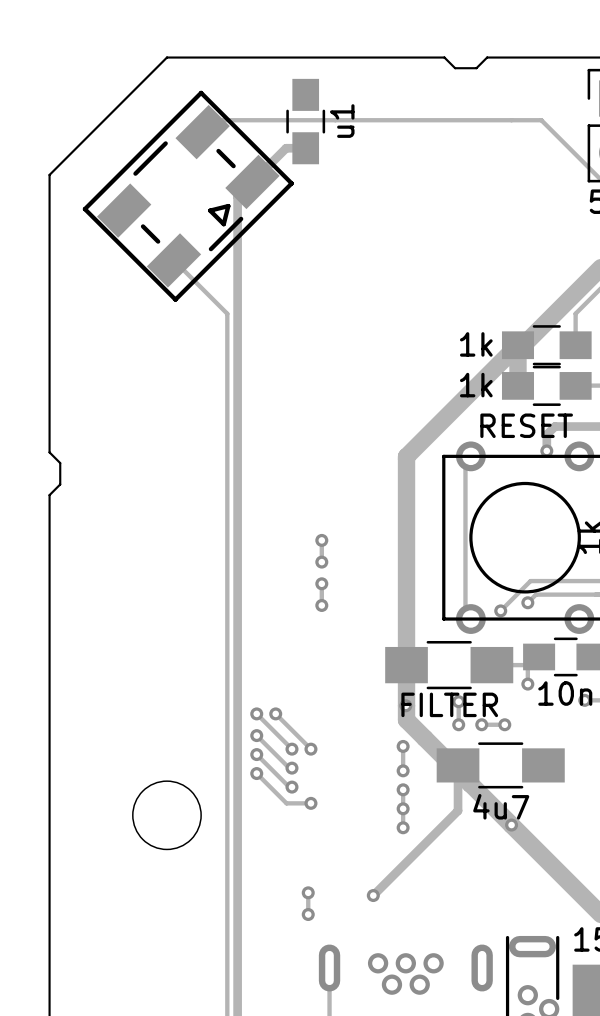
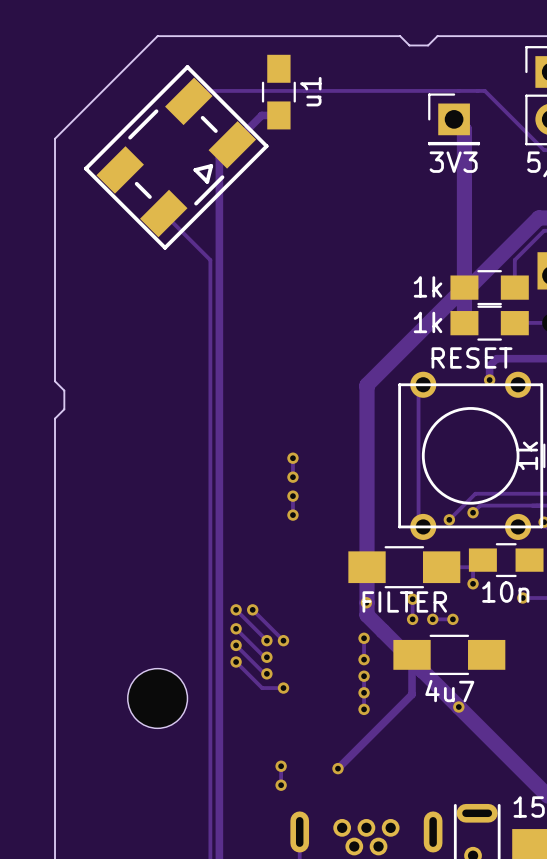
track: none -> (454, 119) (464, 129) (464, 287)
part: none -> 3V3 (454, 119)

